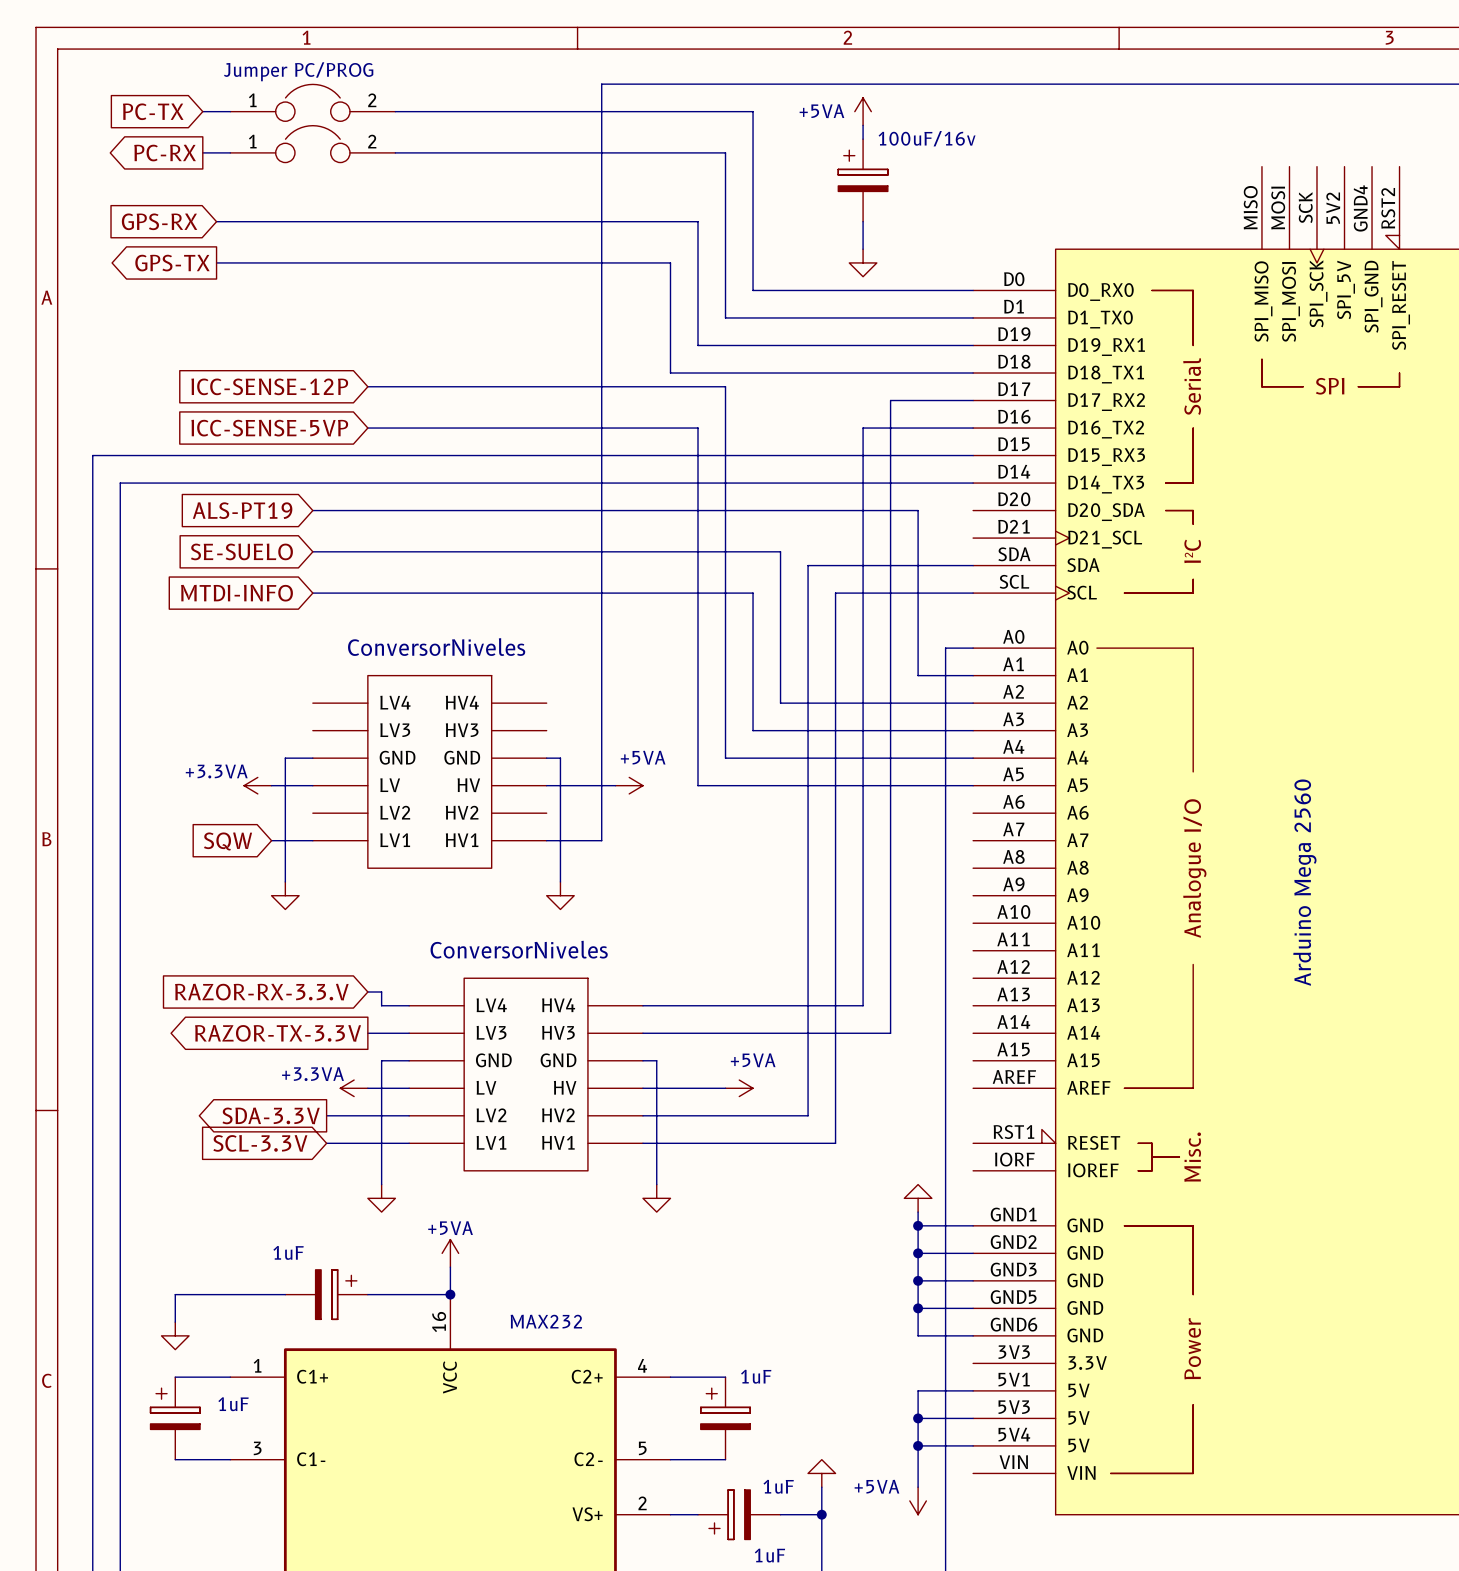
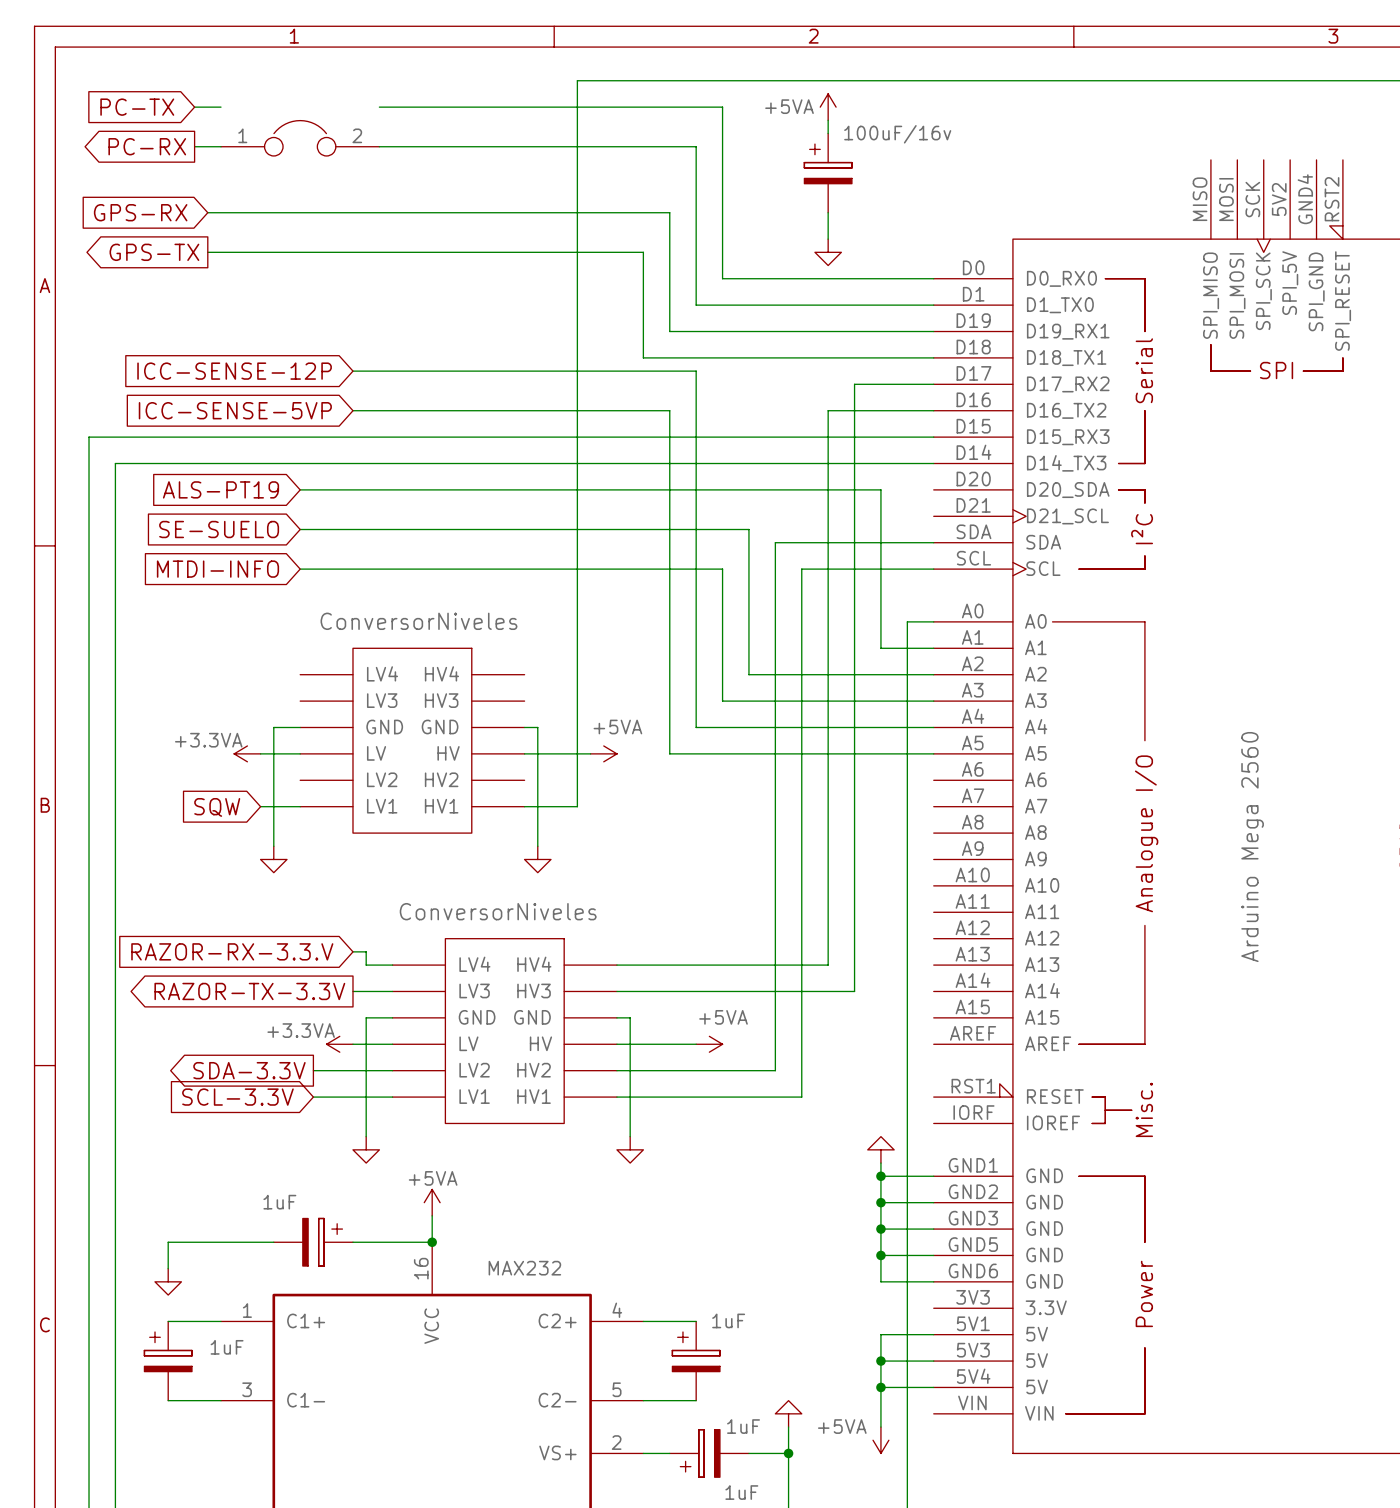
part: Jumper PC/PROG (312, 102) -> none

